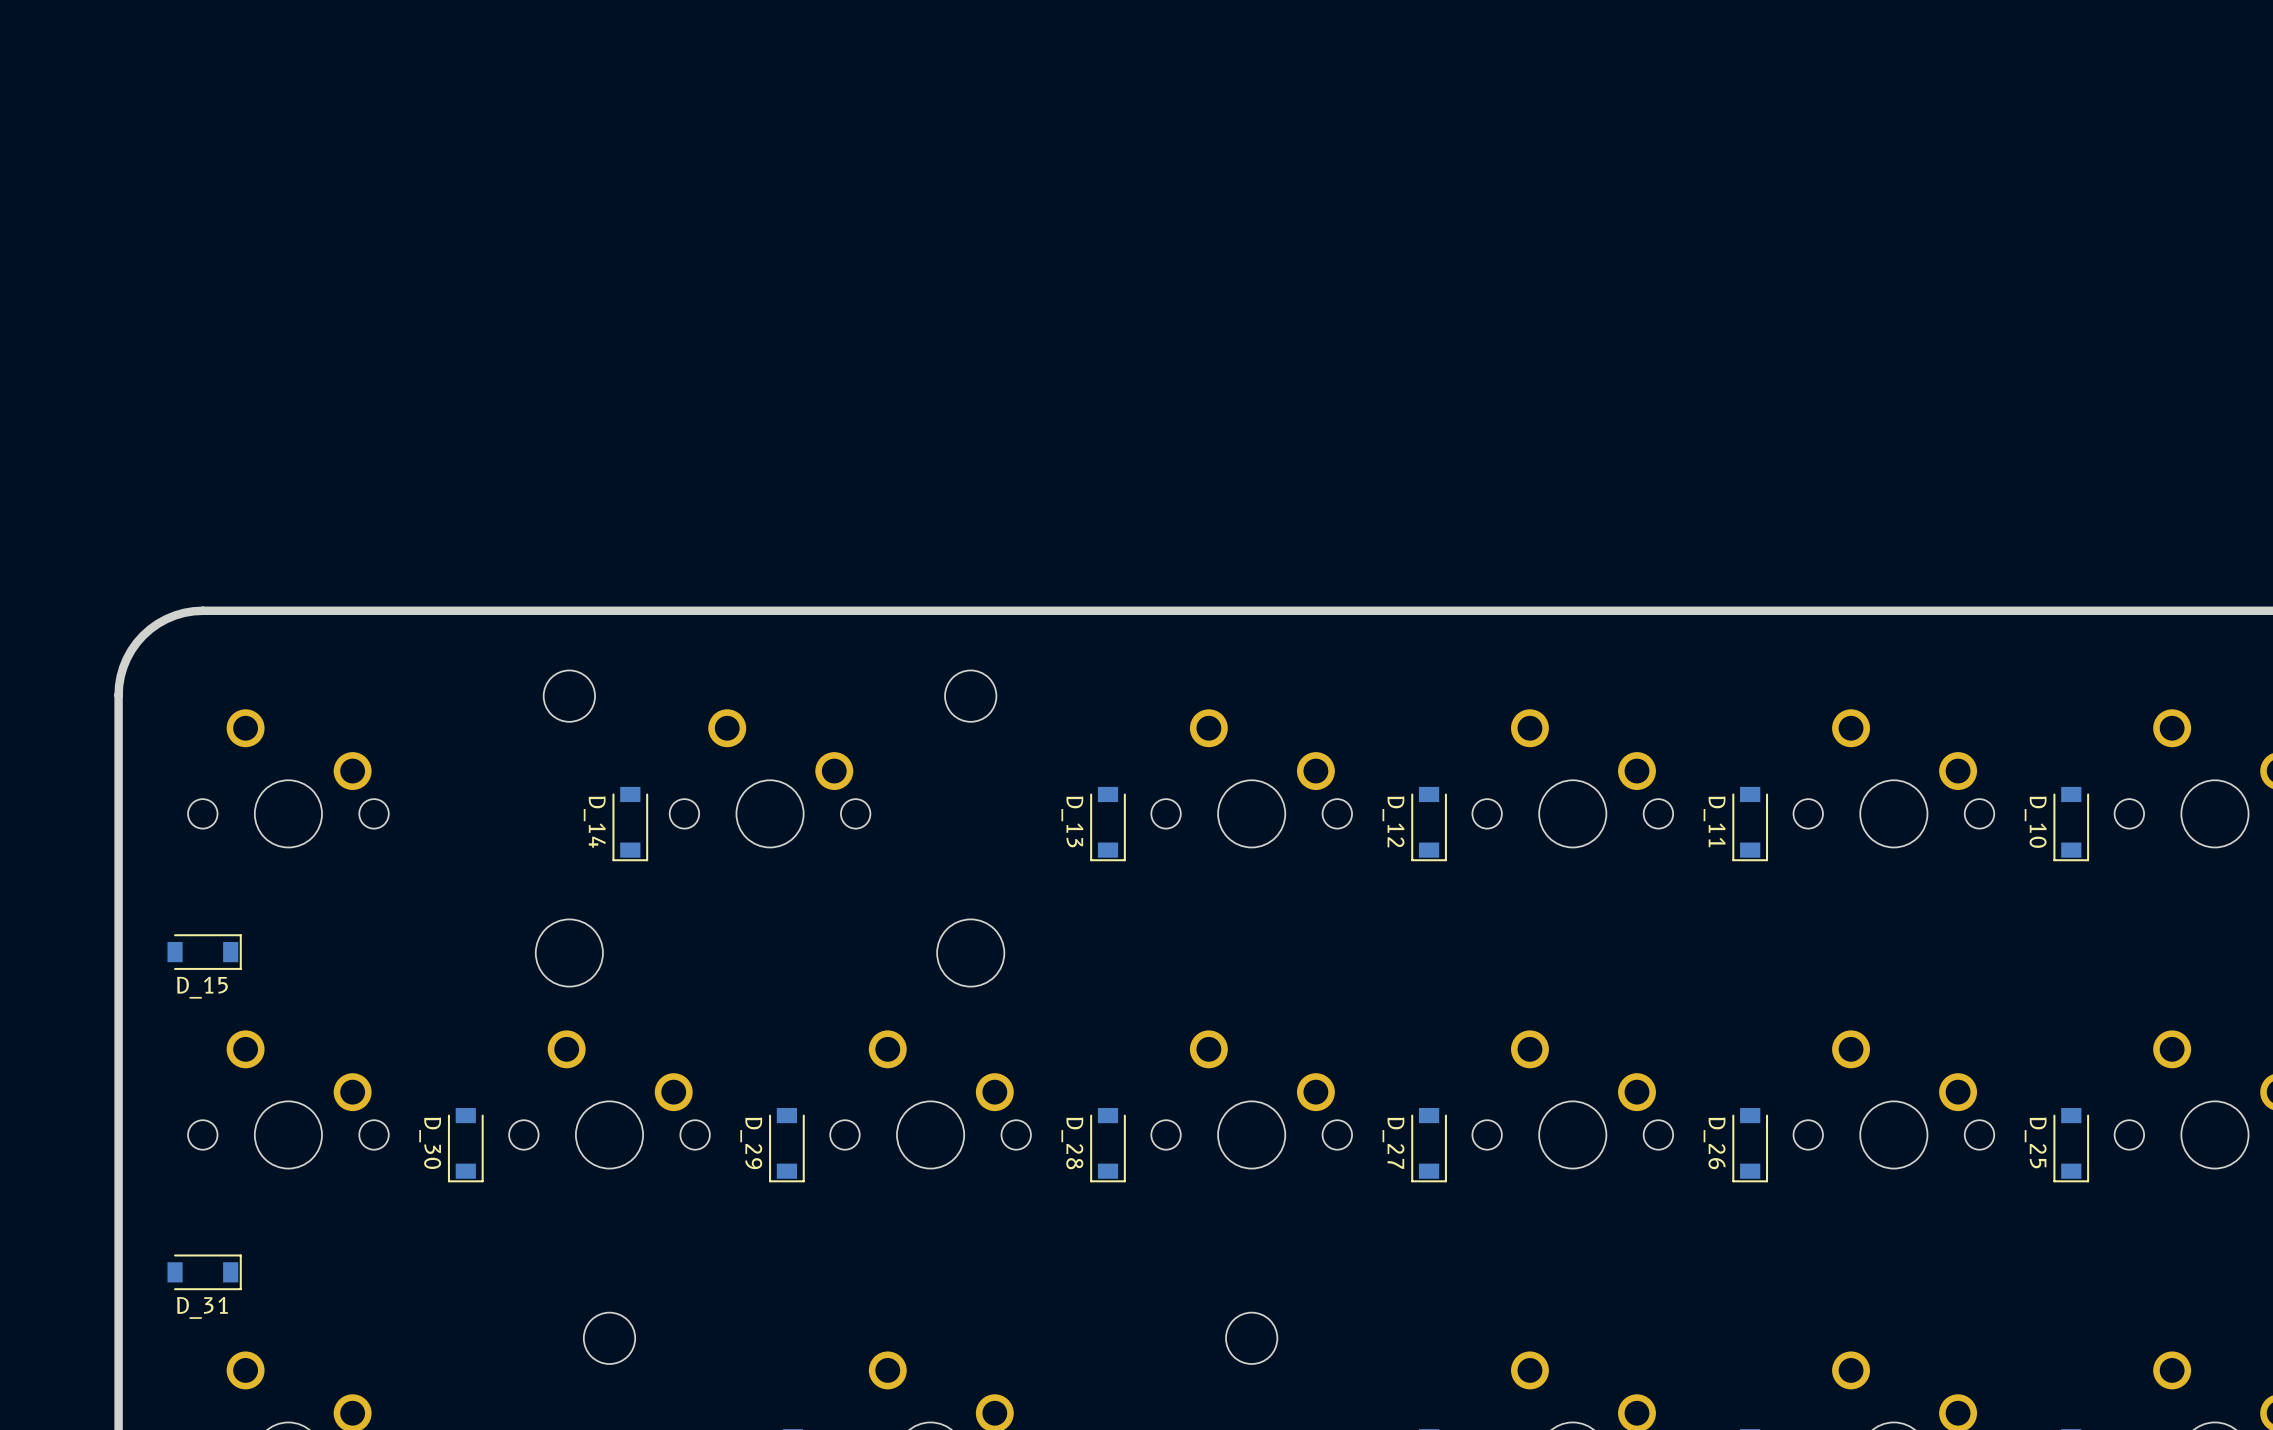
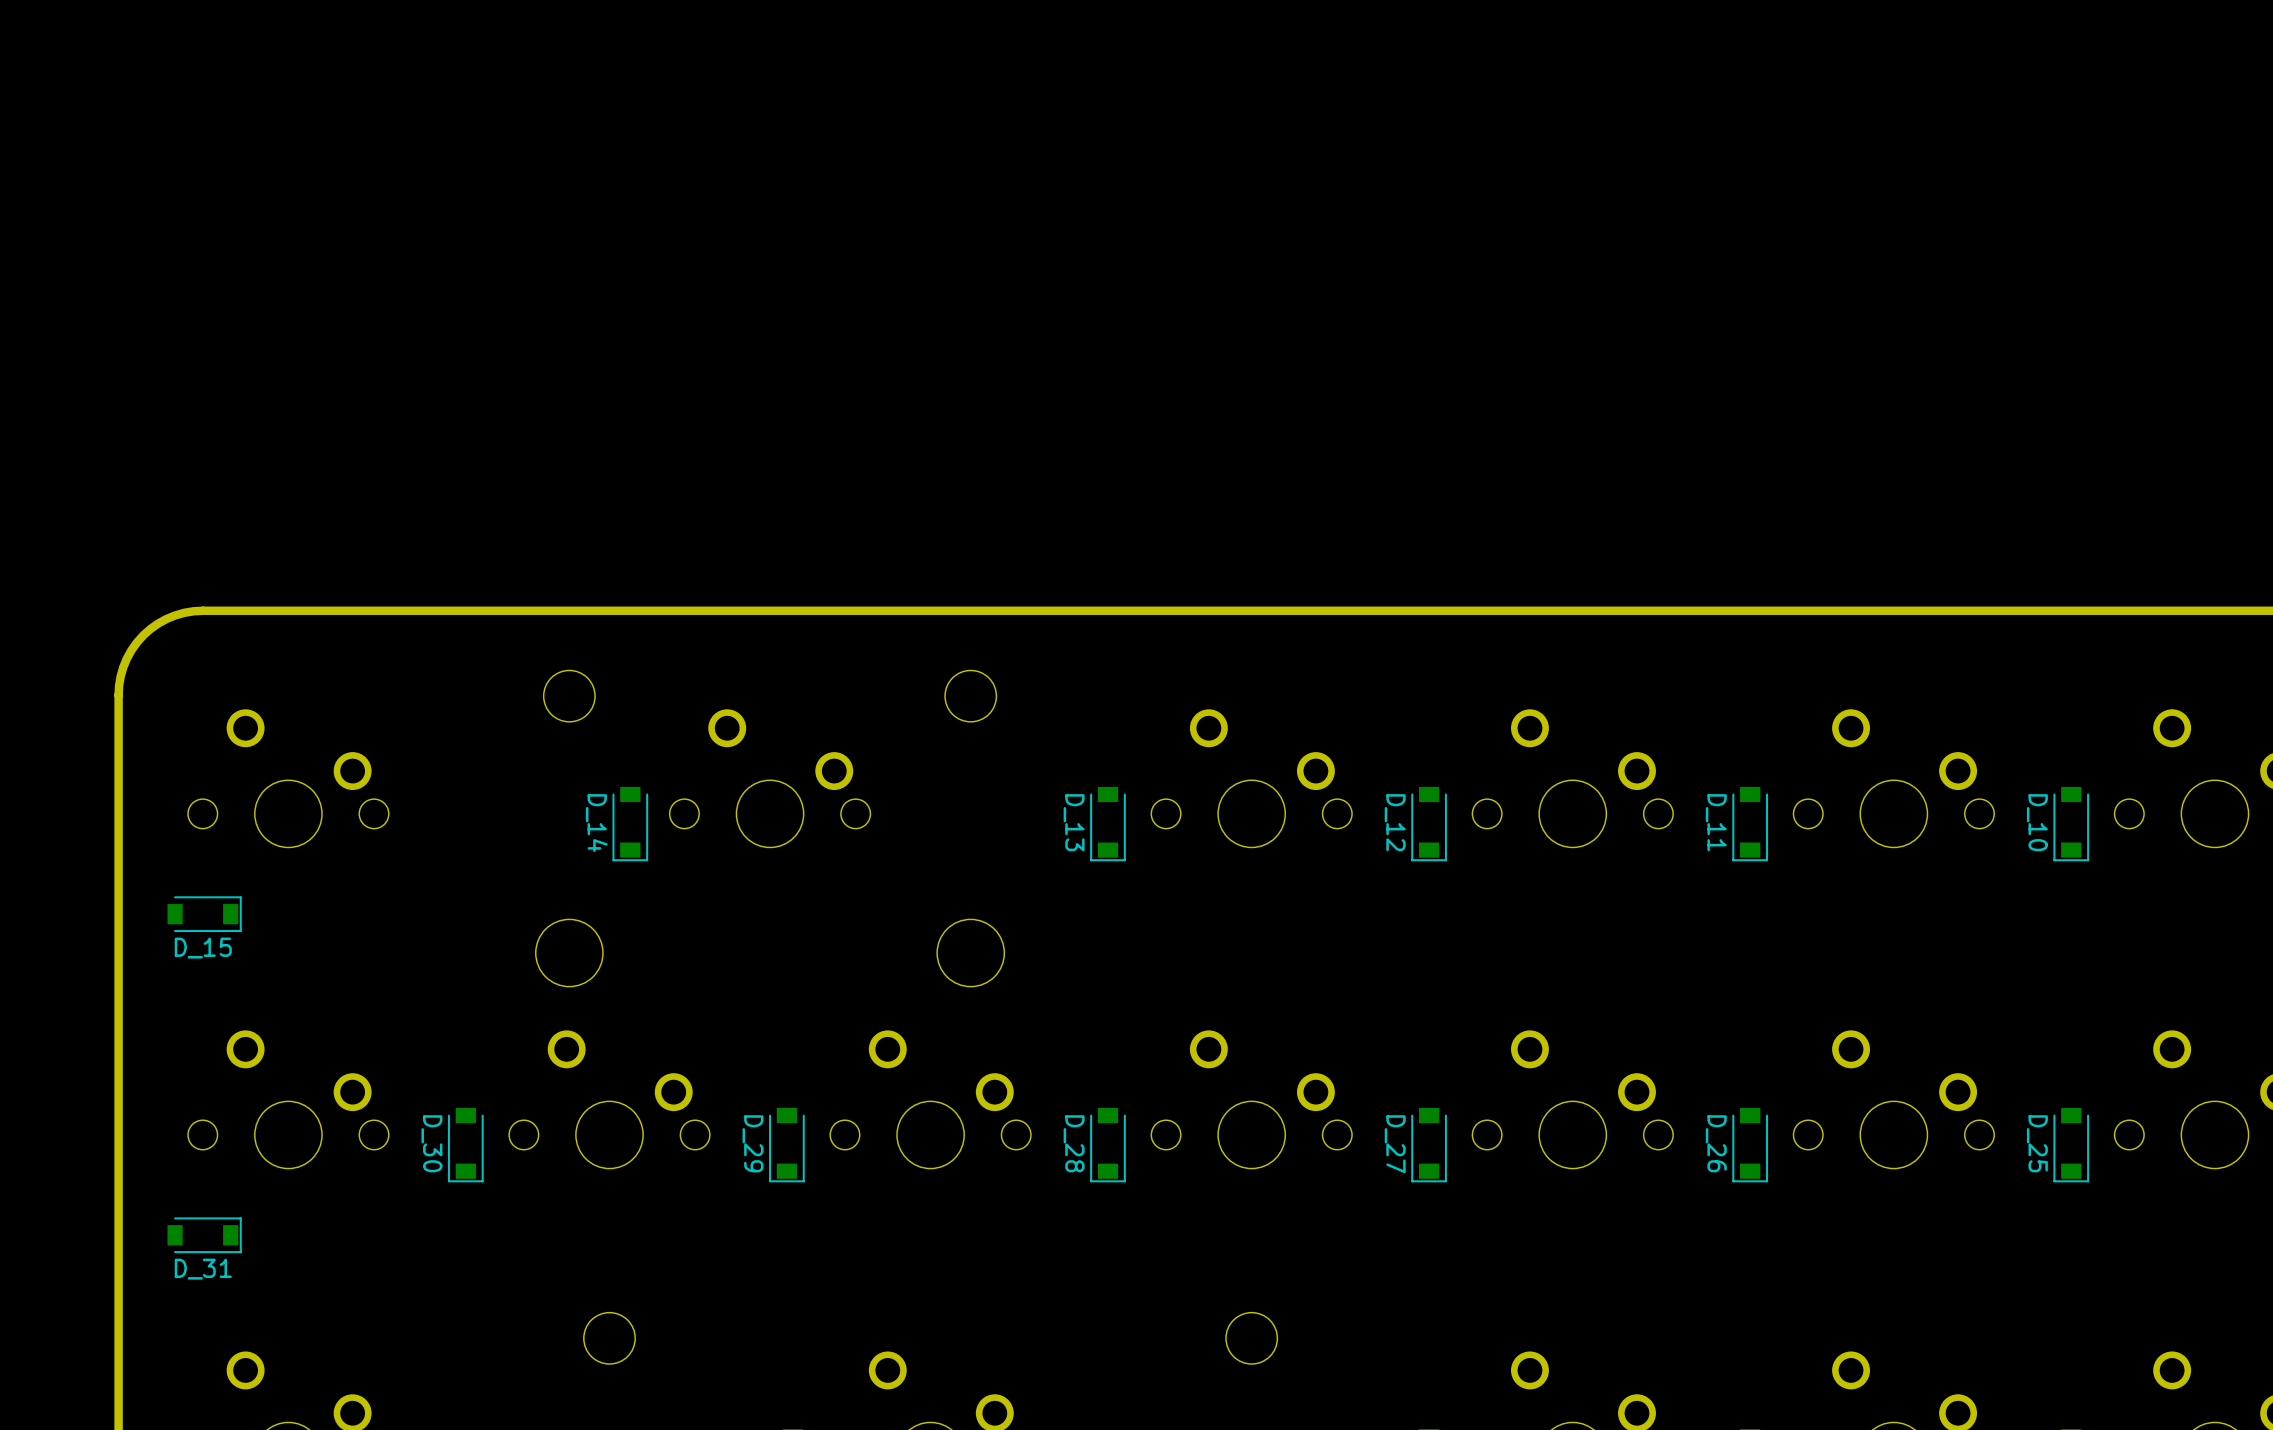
D_15 position: (204, 952) -> (204, 914)
D_31 position: (204, 1272) -> (204, 1235)

